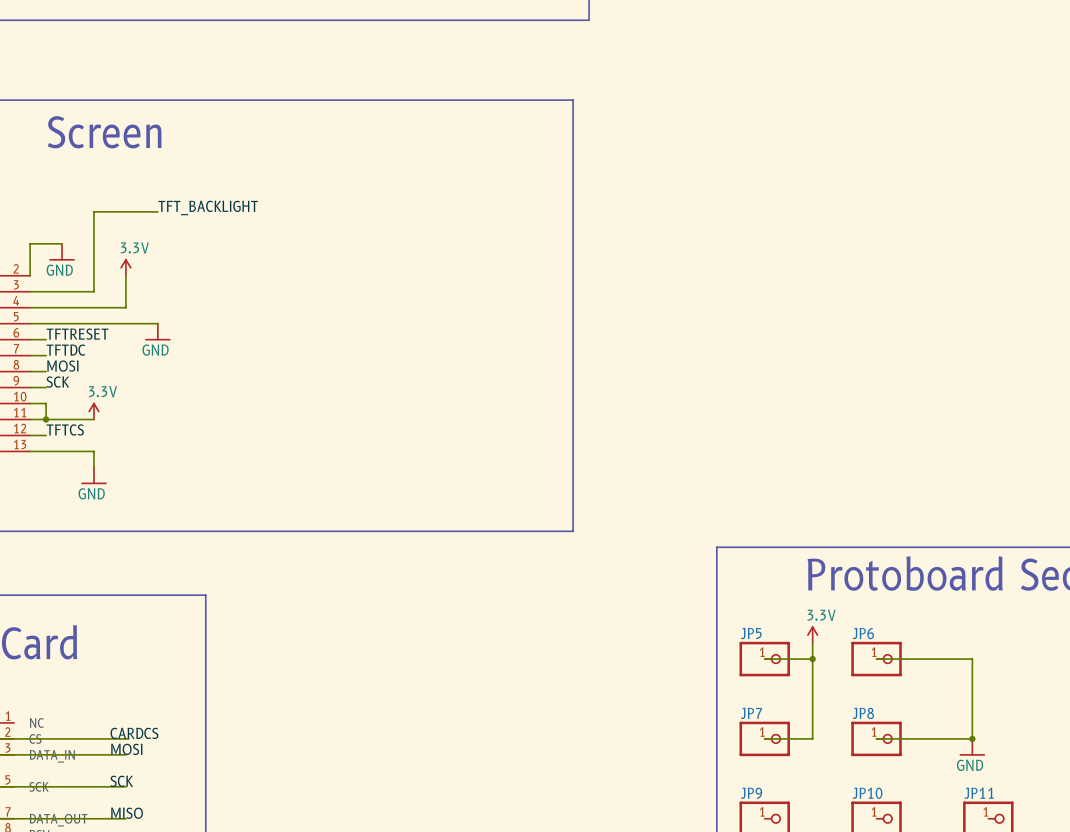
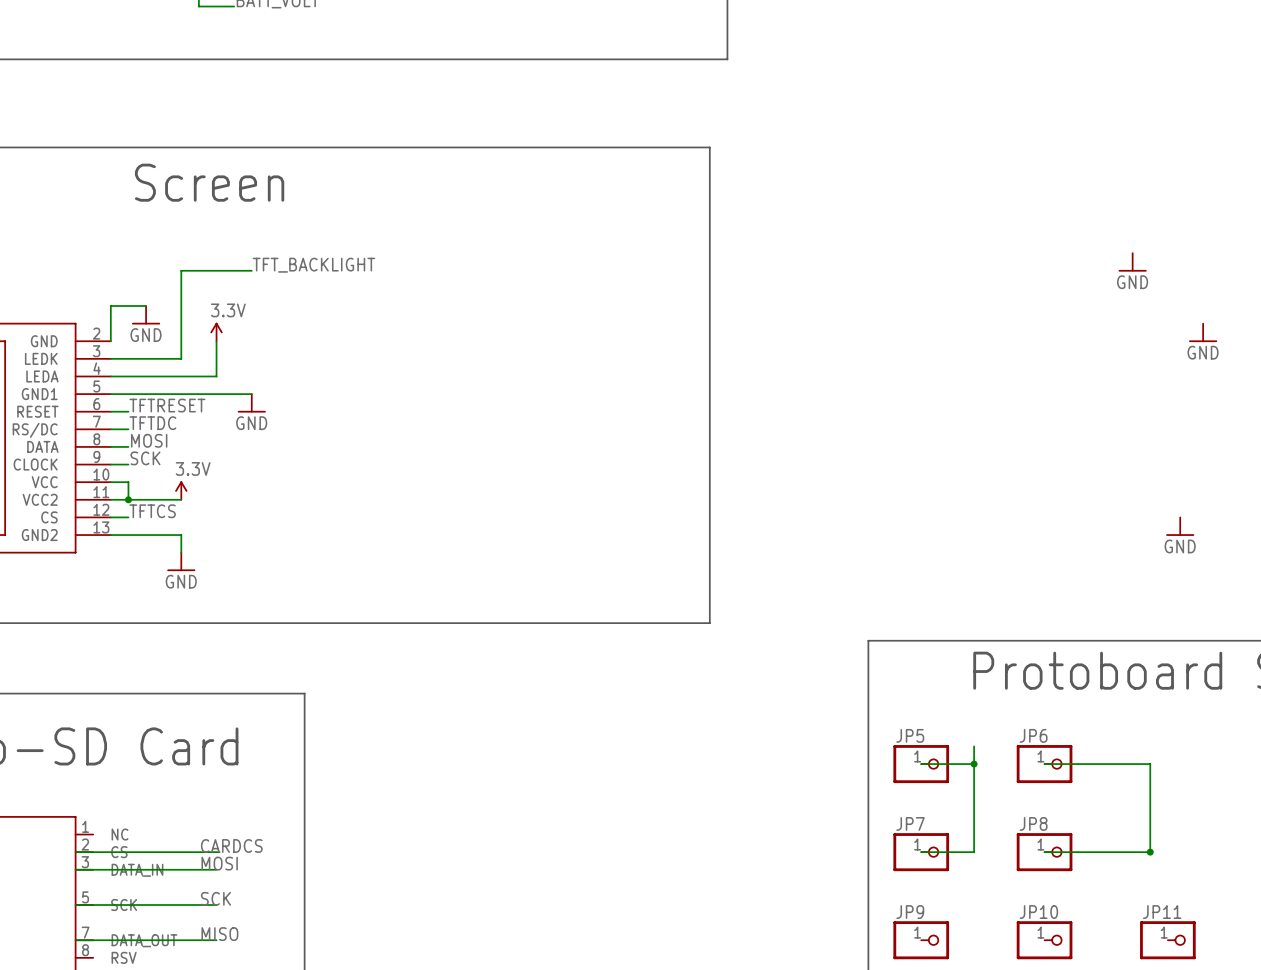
power symbol: none -> GND (1132, 262)
power symbol: none -> GND (1203, 332)
power symbol: none -> GND (1180, 526)
power symbol: 3.3V (812, 634) -> none
power symbol: GND (972, 747) -> none

